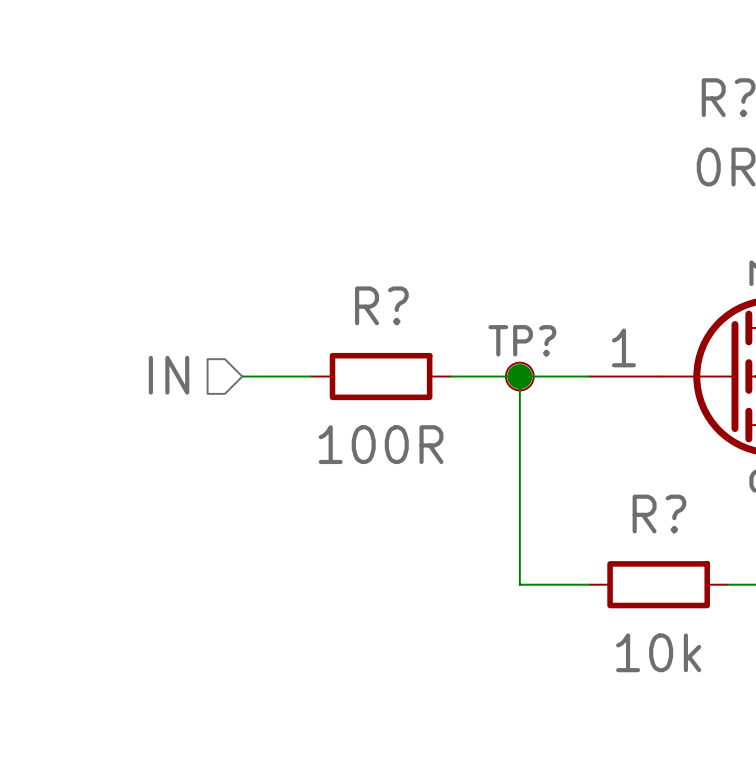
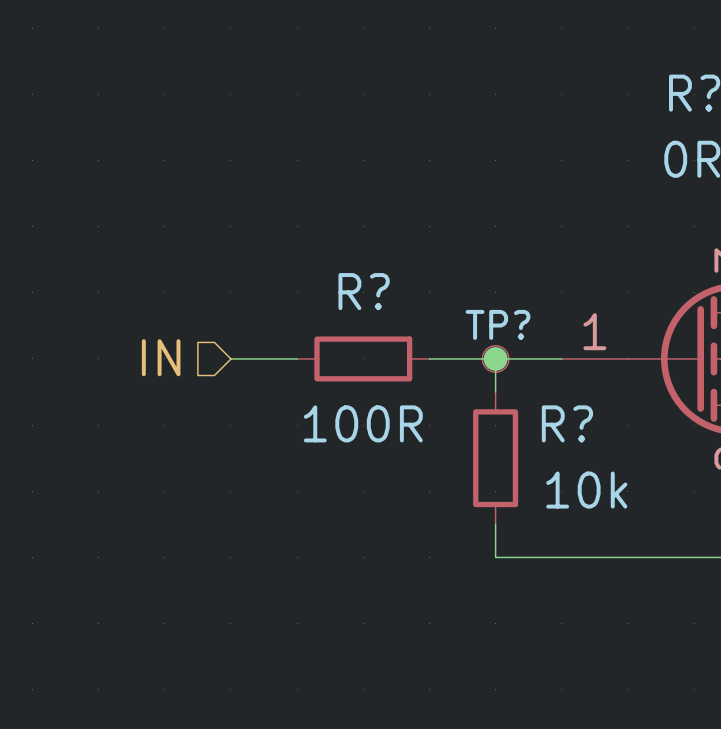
wire: (519, 411) (519, 550) -> none
wire: none -> (561, 557) (694, 557)
R? rotation: 0° (658, 584) -> 90° clockwise (495, 458)
R? position: (658, 584) -> (495, 458)
R? value position: 10k (658, 652) -> 10k (586, 490)

